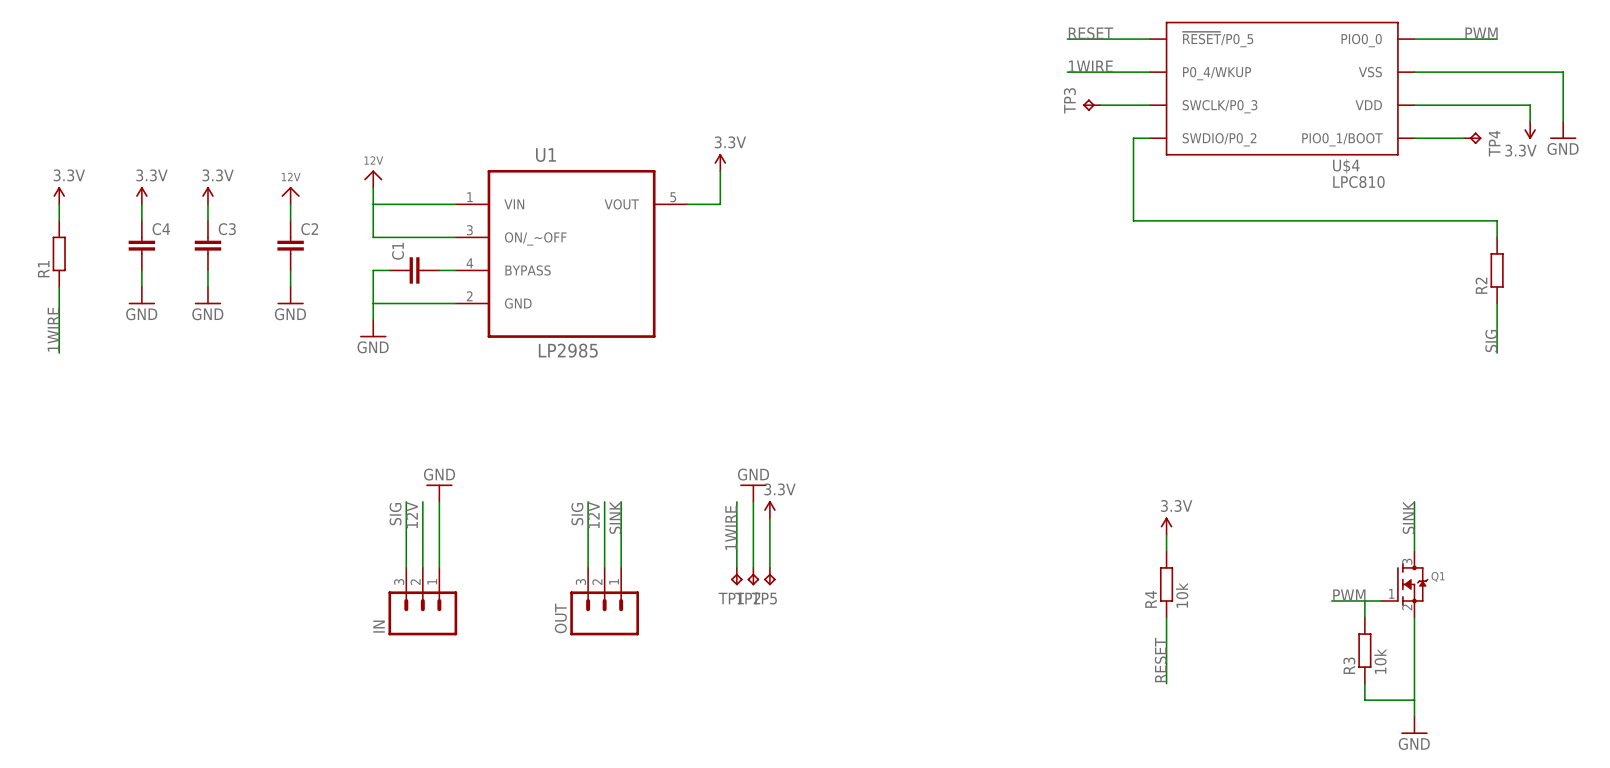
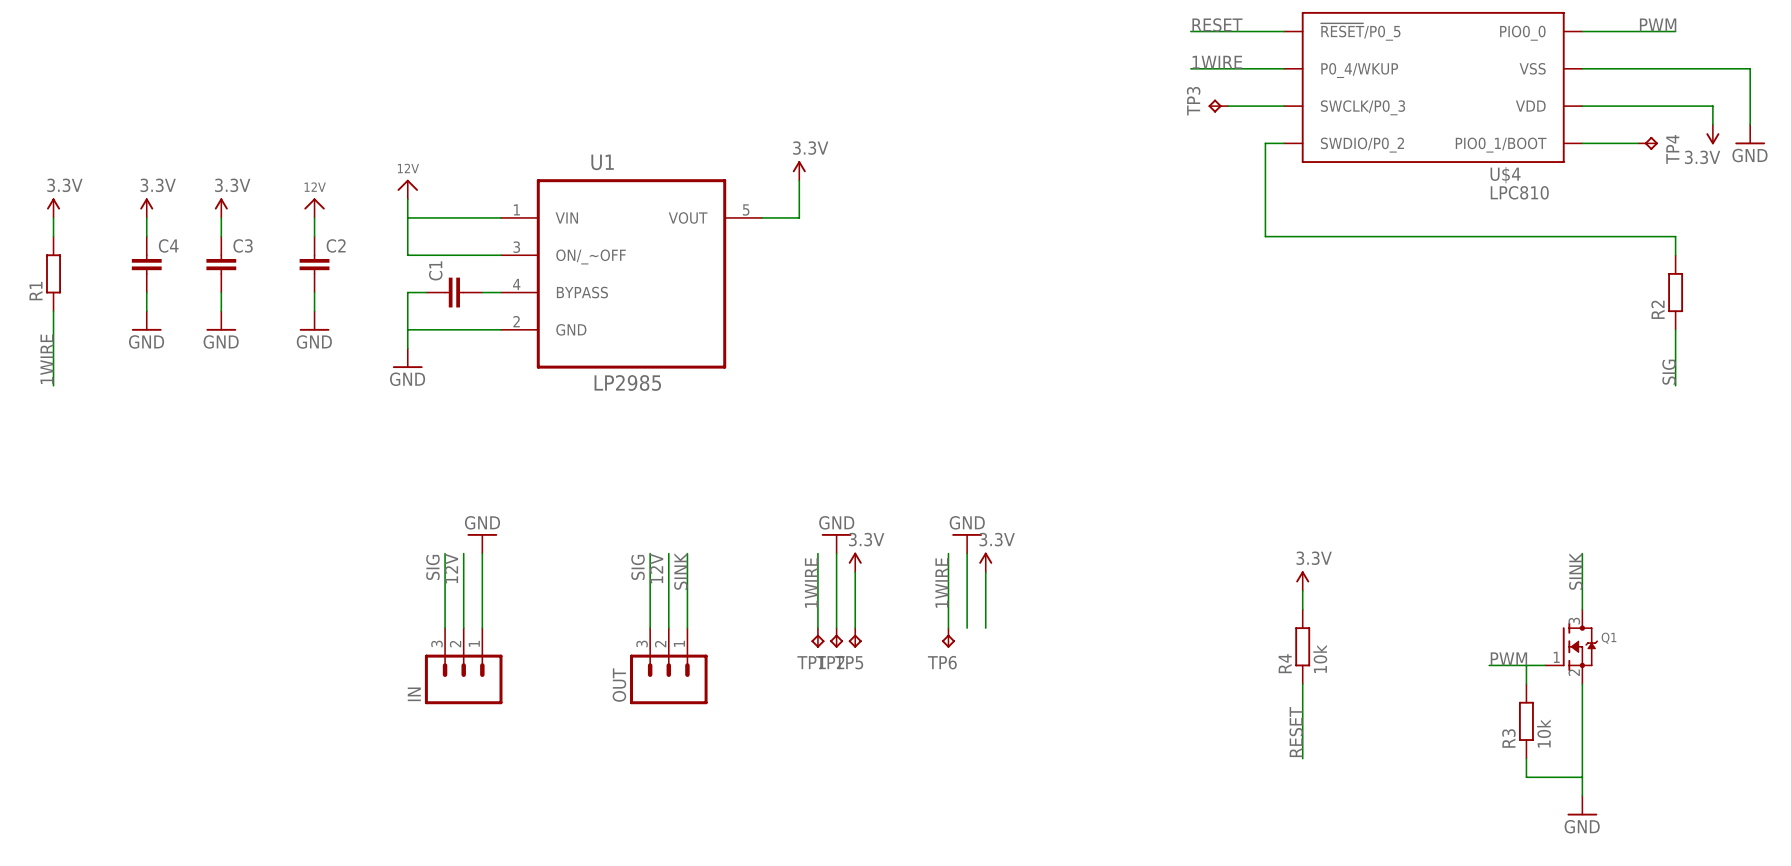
power symbol: none -> GND (967, 543)
wire: none -> (948, 553) (948, 628)
wire: none -> (967, 553) (967, 628)
power symbol: none -> 3.3V (985, 562)
wire: none -> (985, 572) (985, 628)
label: none -> 1WIRE (941, 582)
TP6: none -> (948, 637)

